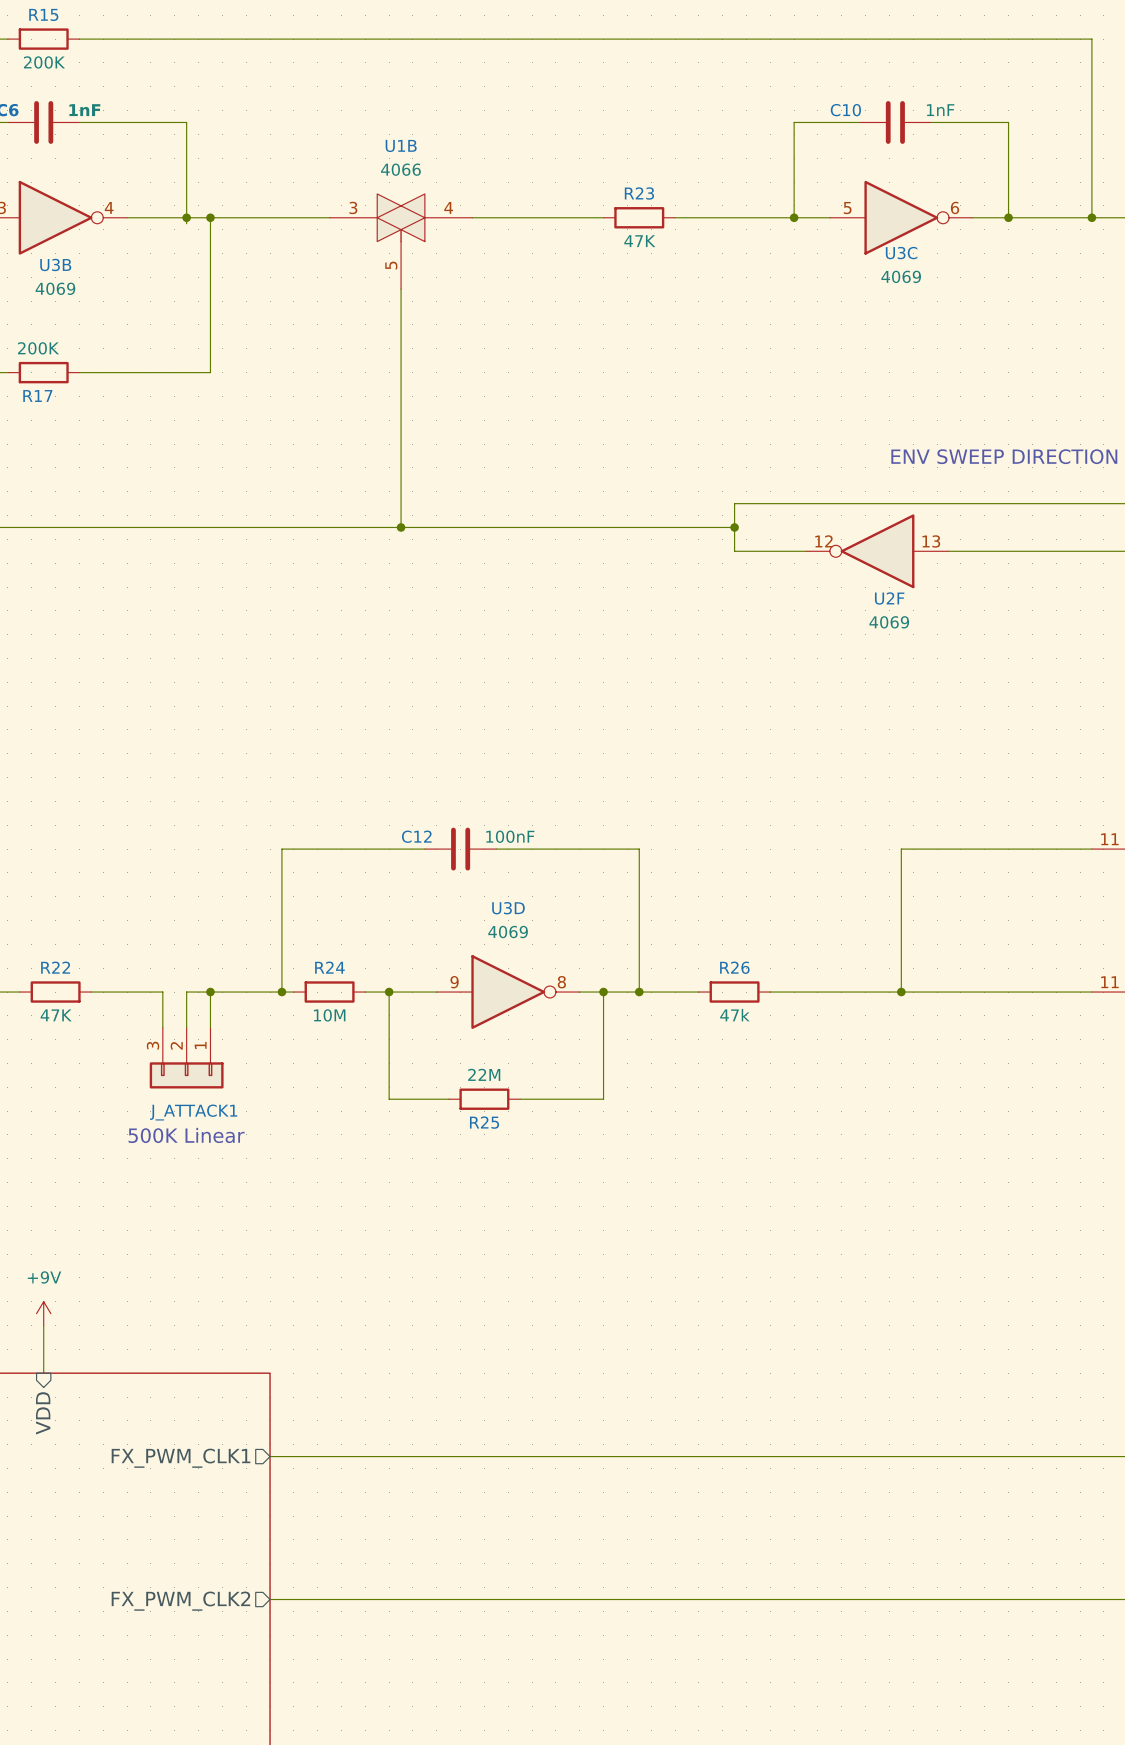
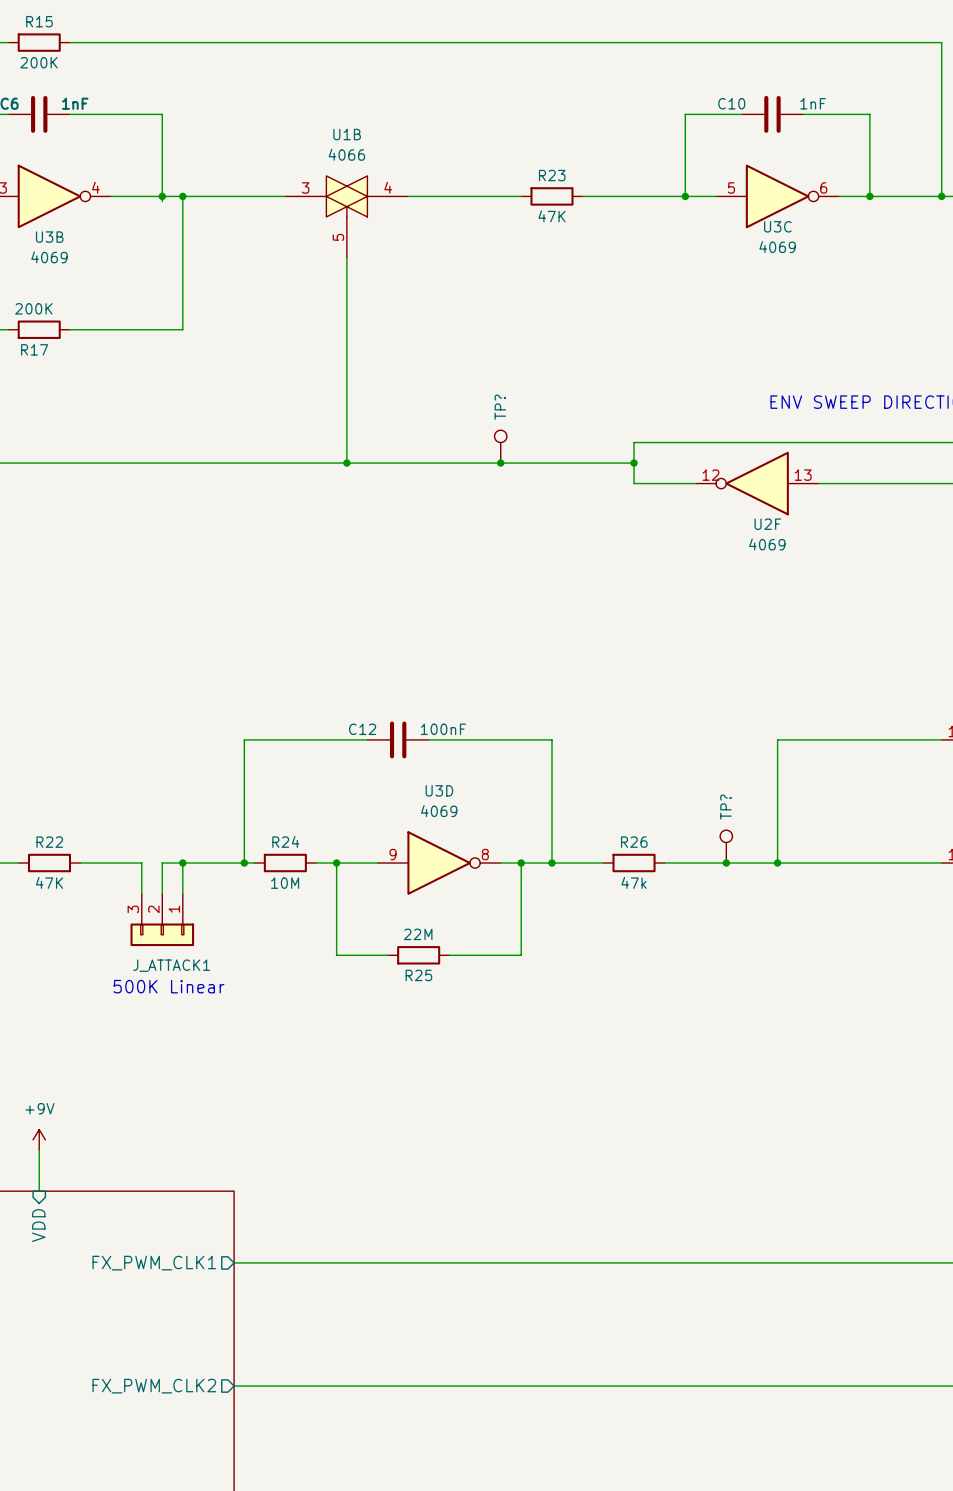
TP?: none -> (500, 446)
junction: none -> (500, 463)
TP?: none -> (726, 846)
junction: none -> (726, 863)

